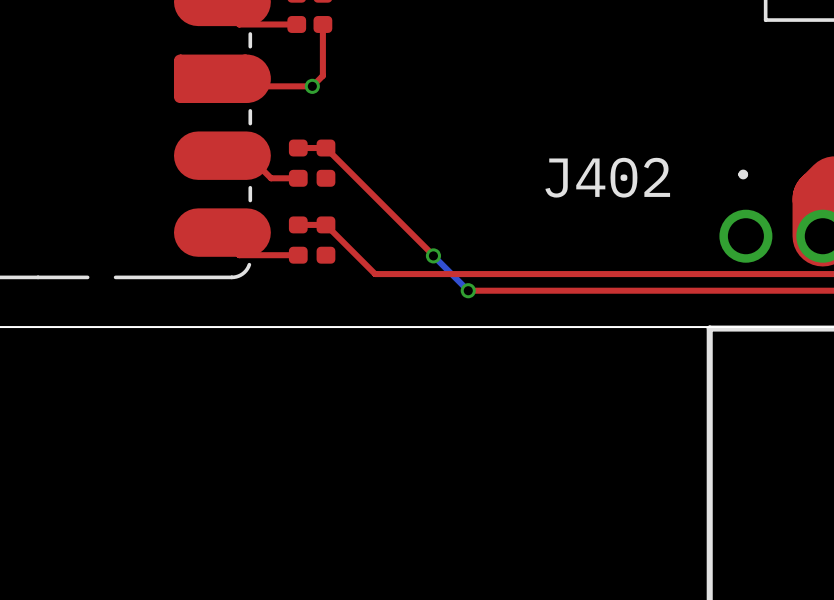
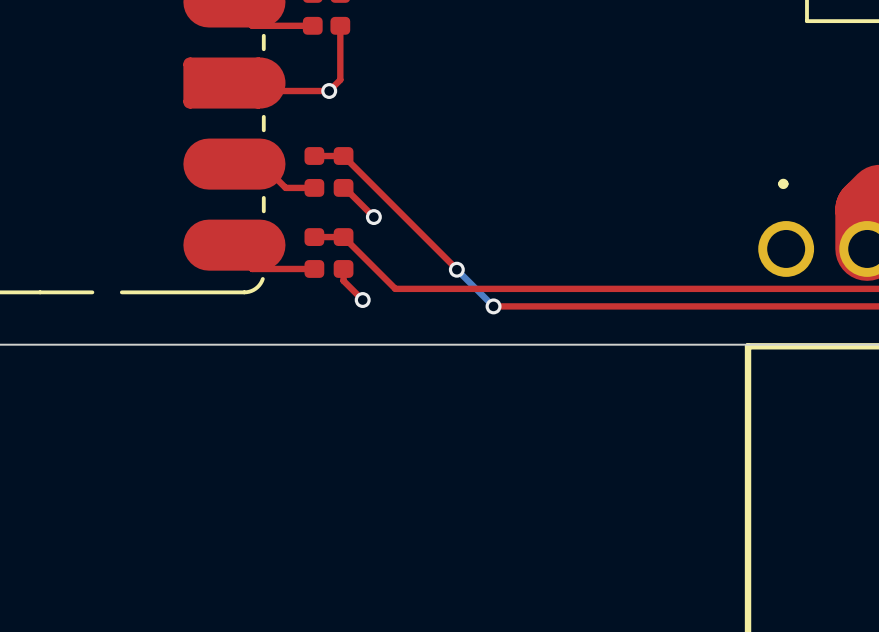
J402 name: J402 (607, 177) -> none
top track: none -> (343, 187) (373, 217)
via: none -> (373, 217)
top track: none -> (343, 268) (343, 280) (362, 300)
via: none -> (362, 300)

